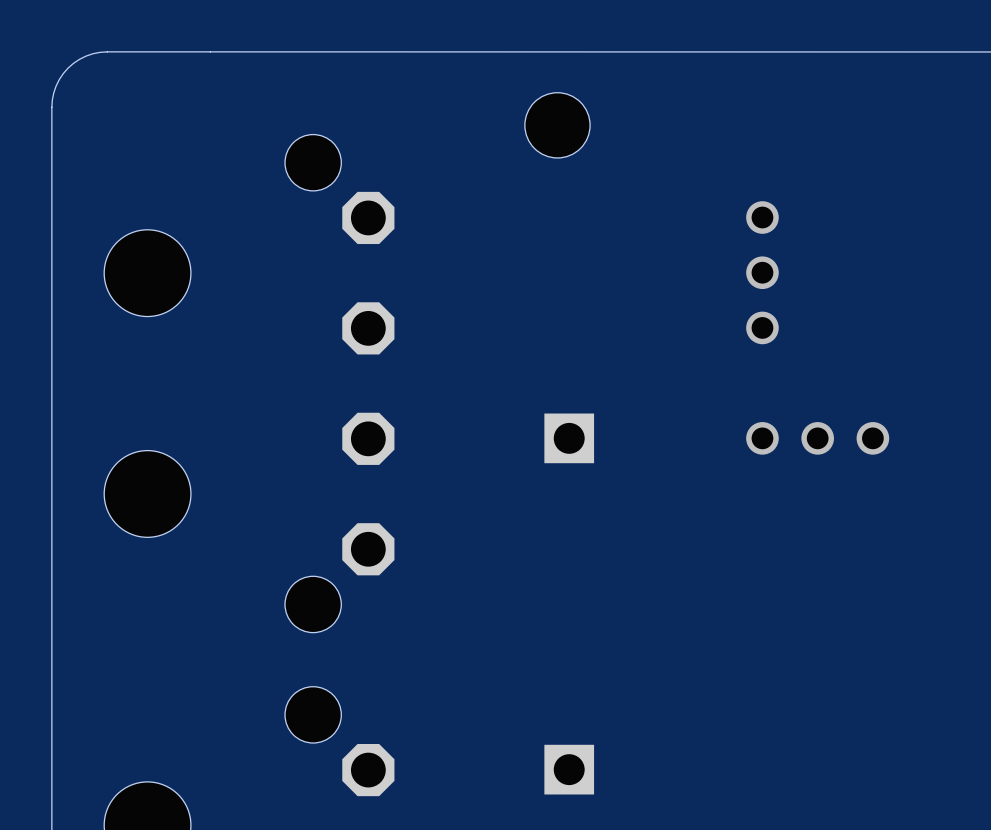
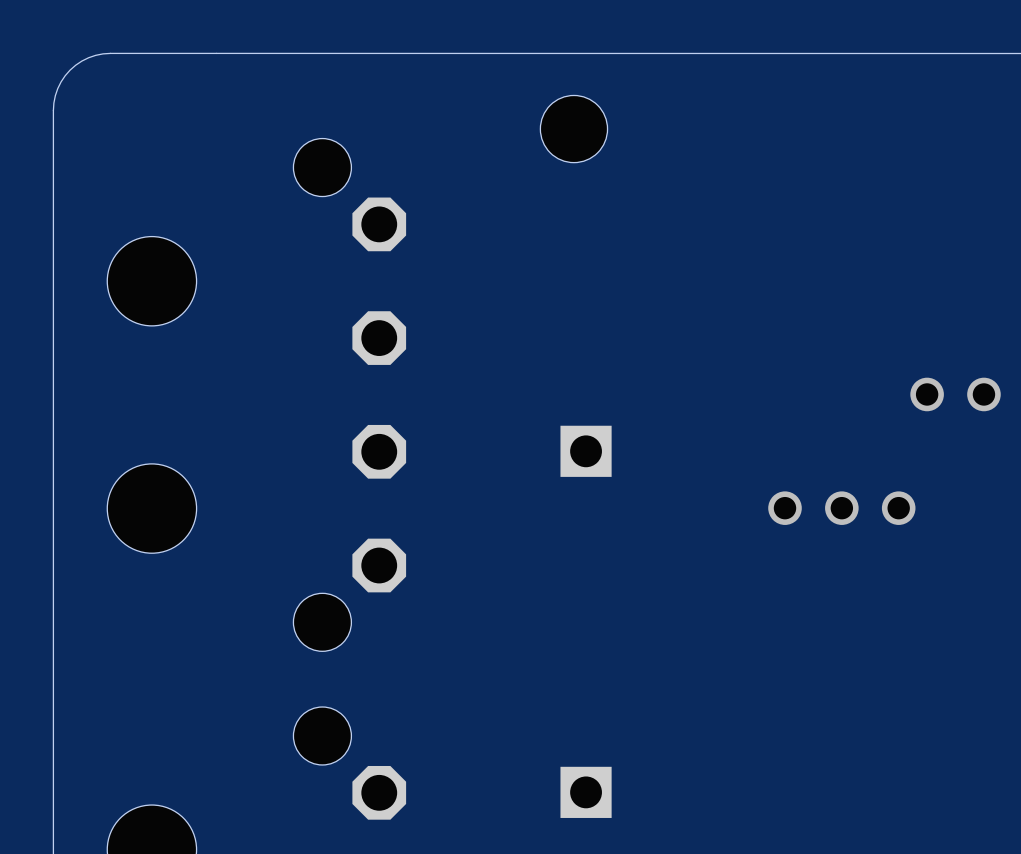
via: (762, 217) -> none
via: (762, 272) -> none
via: (762, 327) -> none
via: none -> (927, 394)
via: none -> (983, 394)
via: (762, 438) -> none
via: (817, 438) -> none
via: (872, 438) -> none
via: none -> (785, 508)
via: none -> (841, 508)
via: none -> (898, 508)

